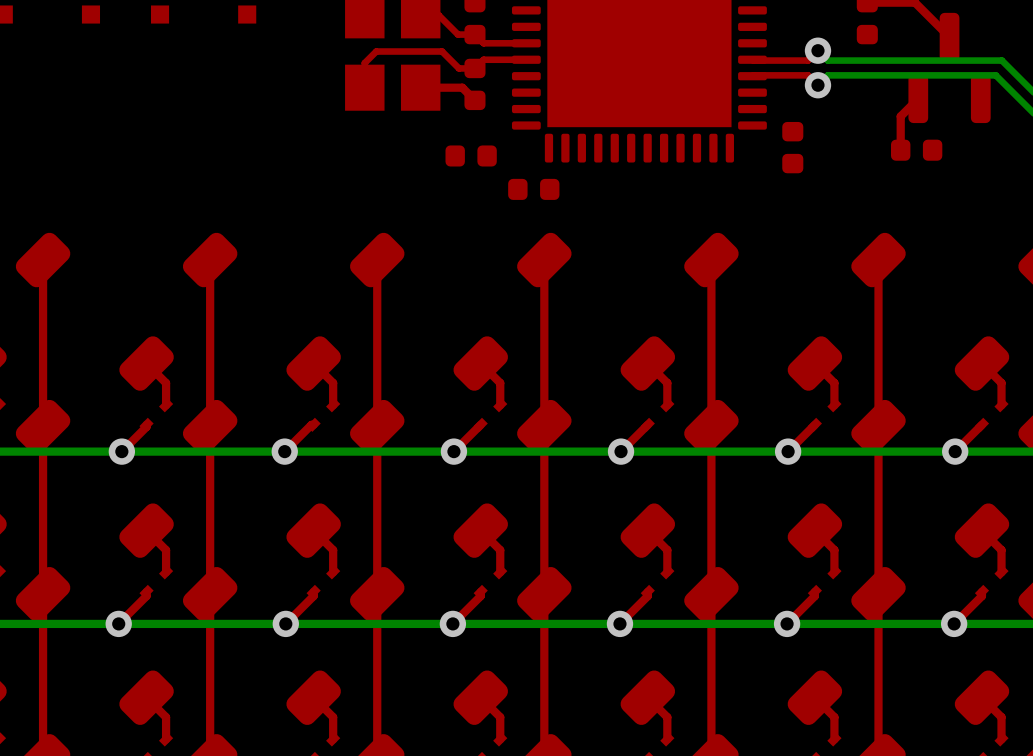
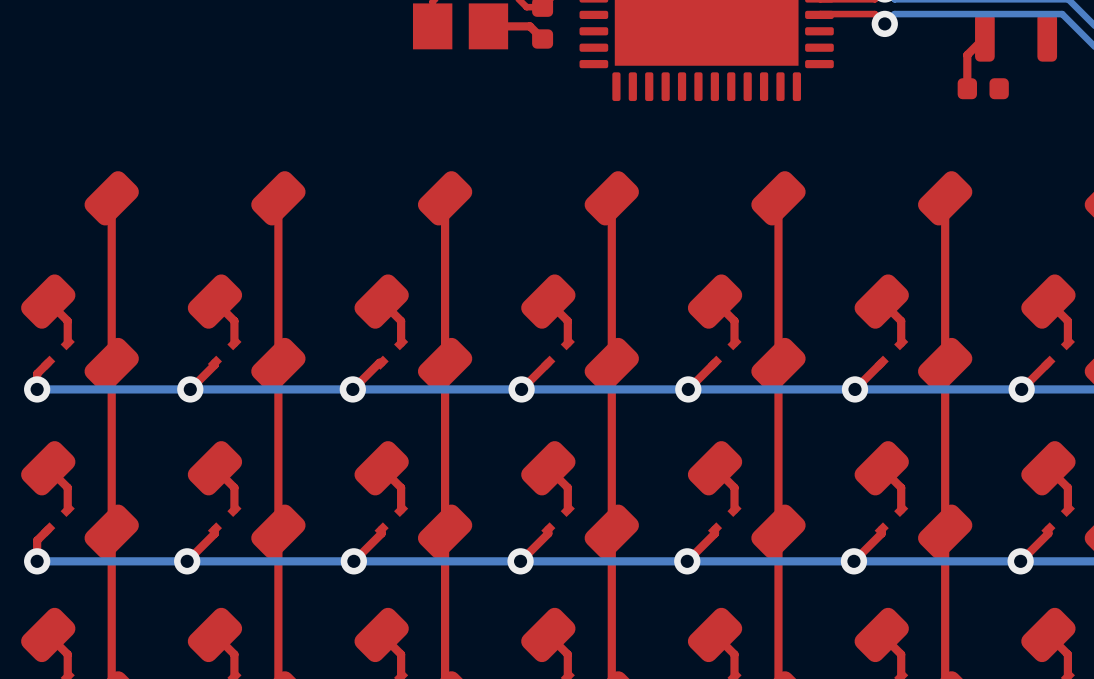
part: (792, 147) -> none
part: (471, 155) -> none
part: (533, 189) -> none

